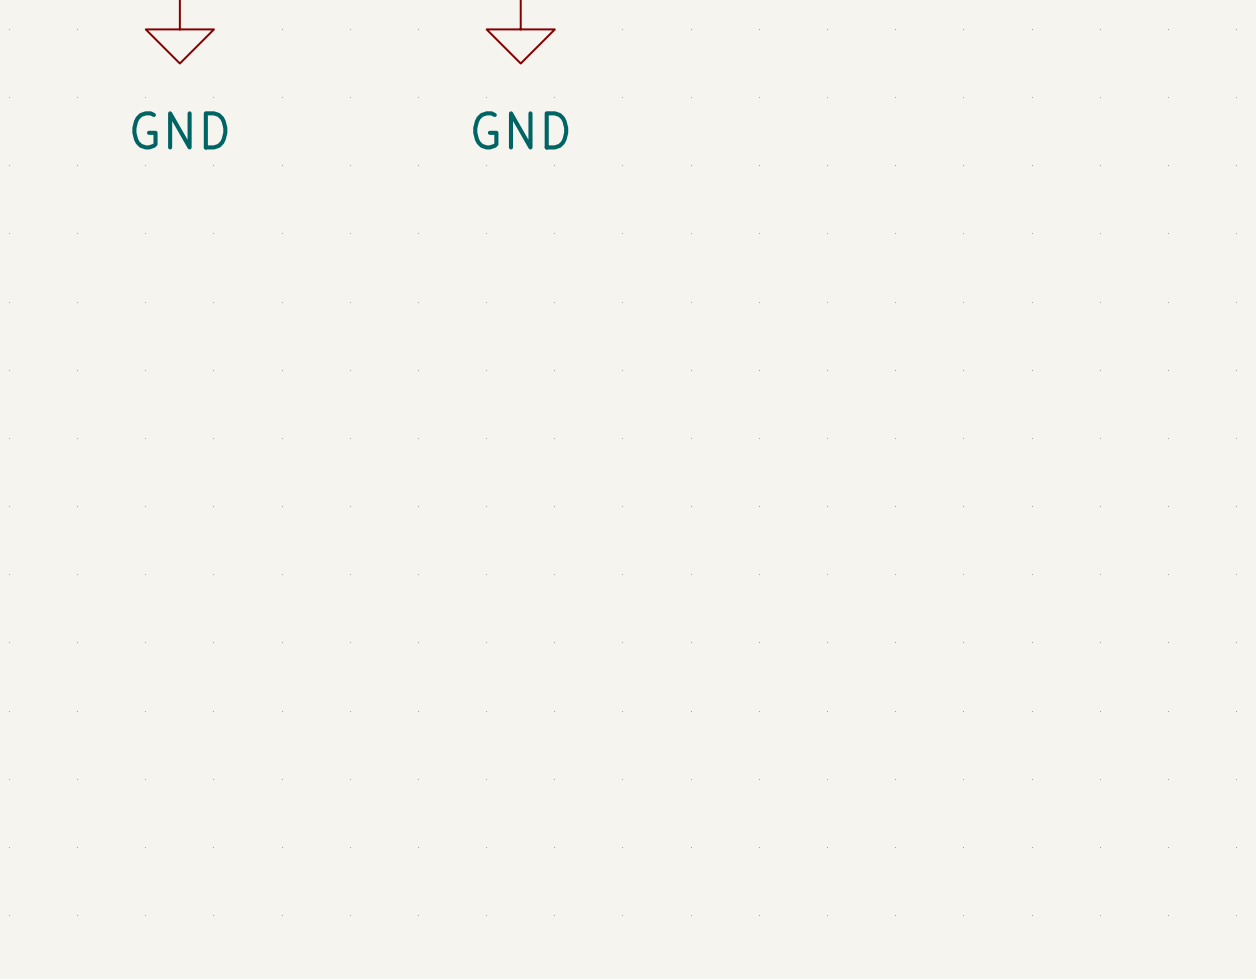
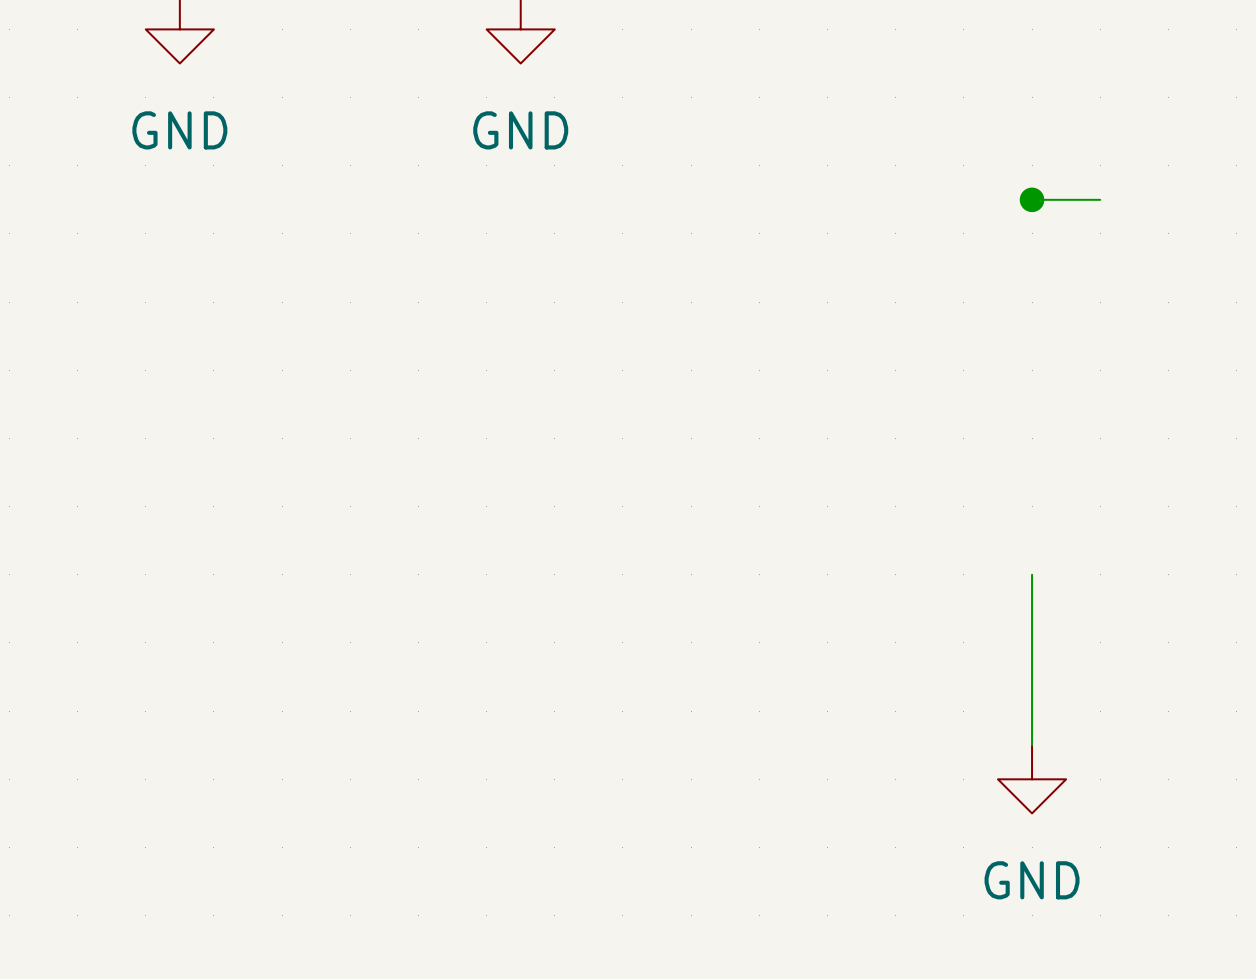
wire: none -> (1032, 199) (1100, 199)
junction: none -> (1032, 199)
wire: none -> (1032, 574) (1032, 745)
power symbol: none -> GND (1032, 779)

